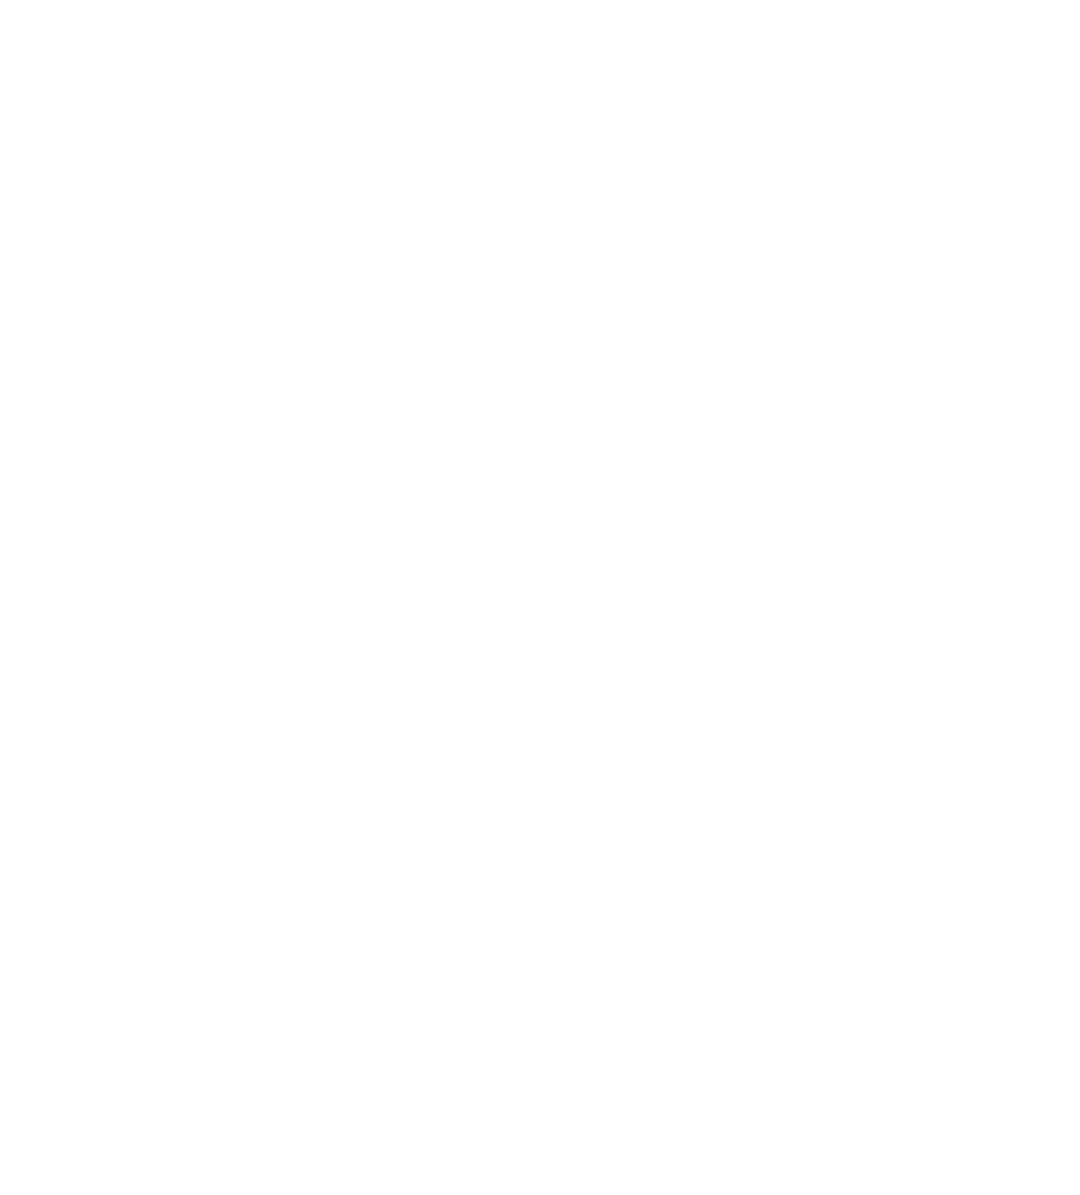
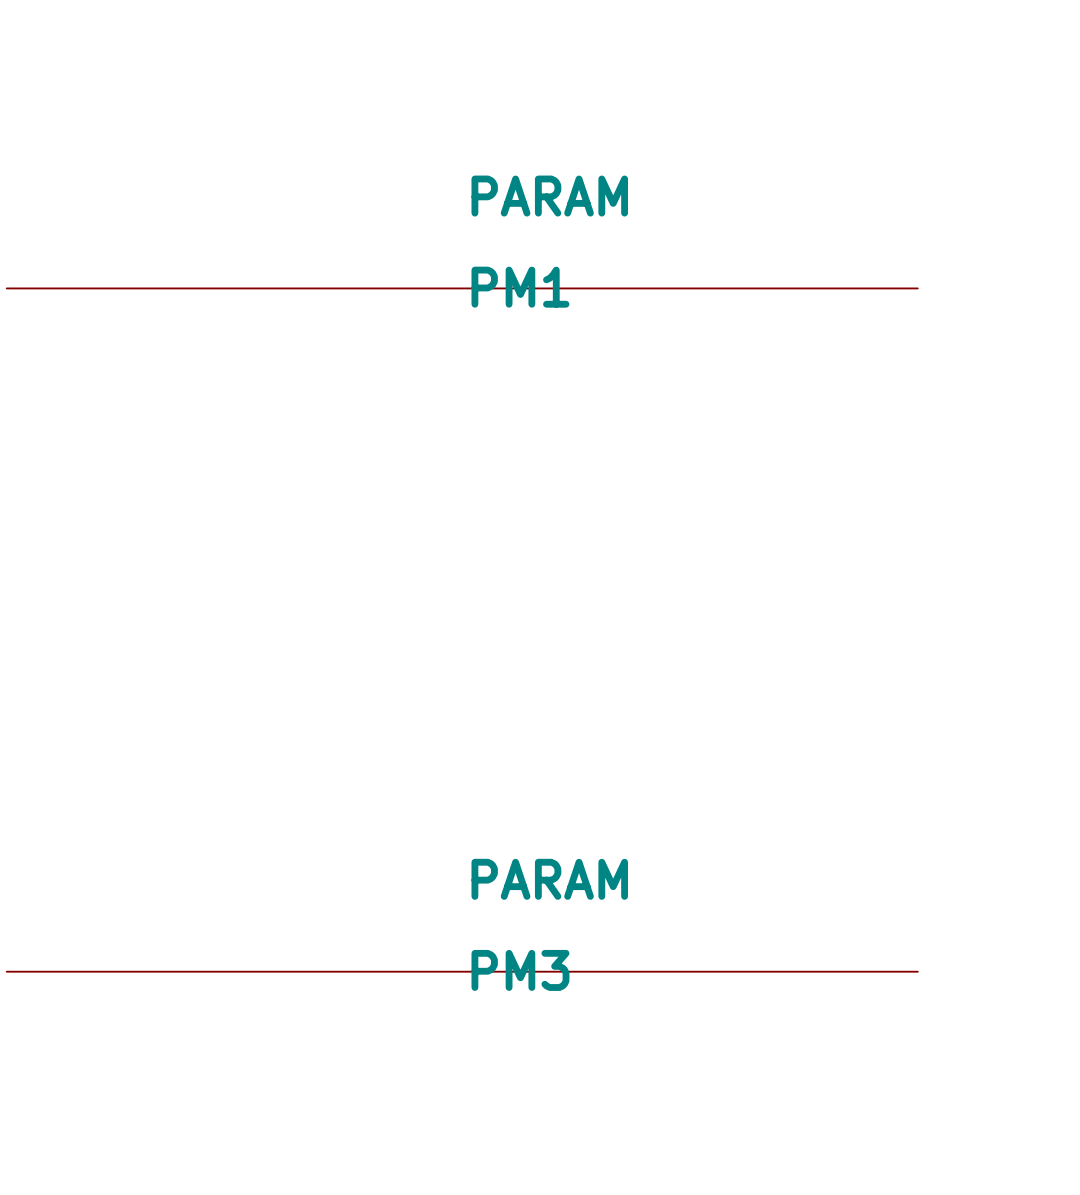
PM1: none -> PARAM (462, 288)
PM3: none -> PARAM (462, 971)

